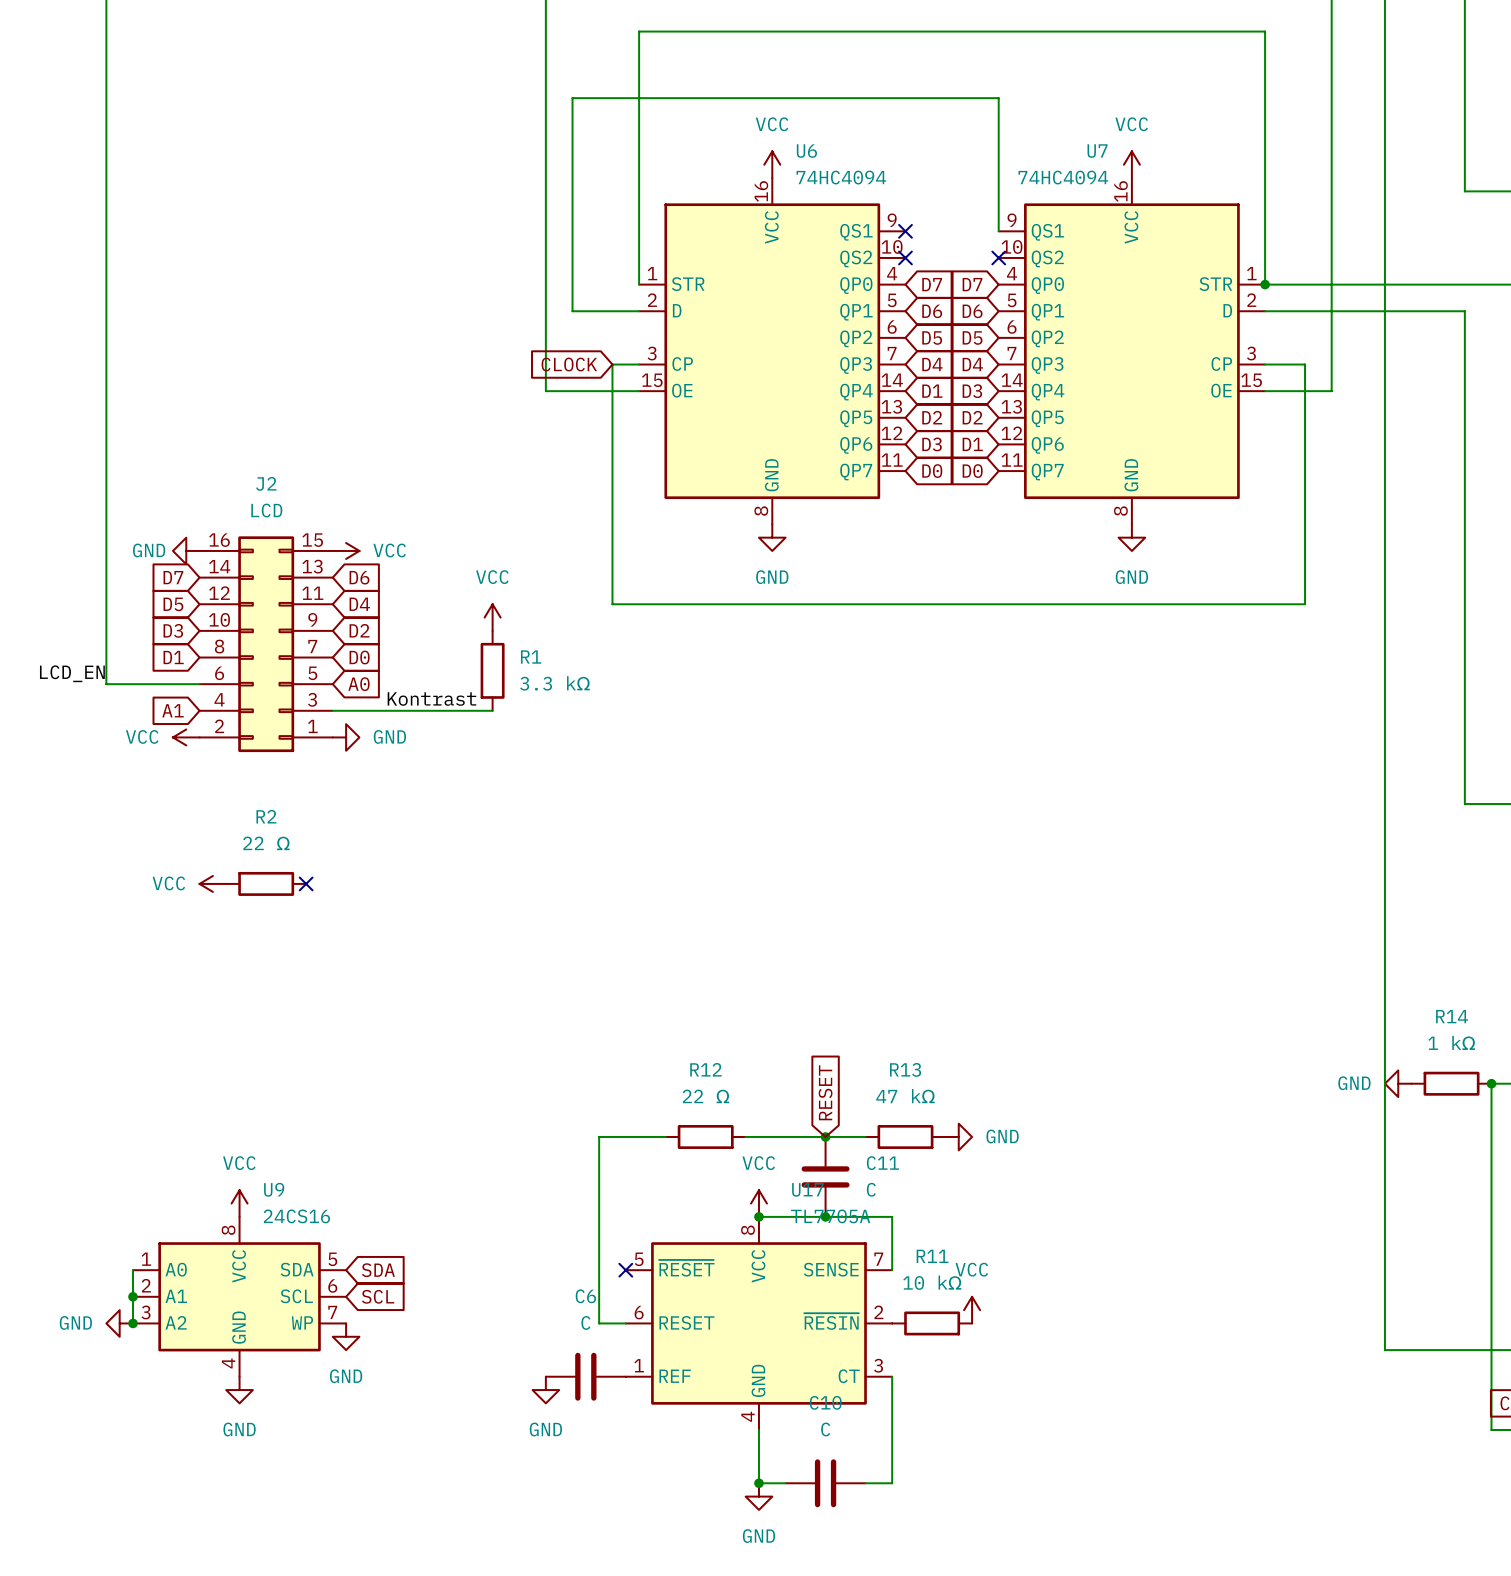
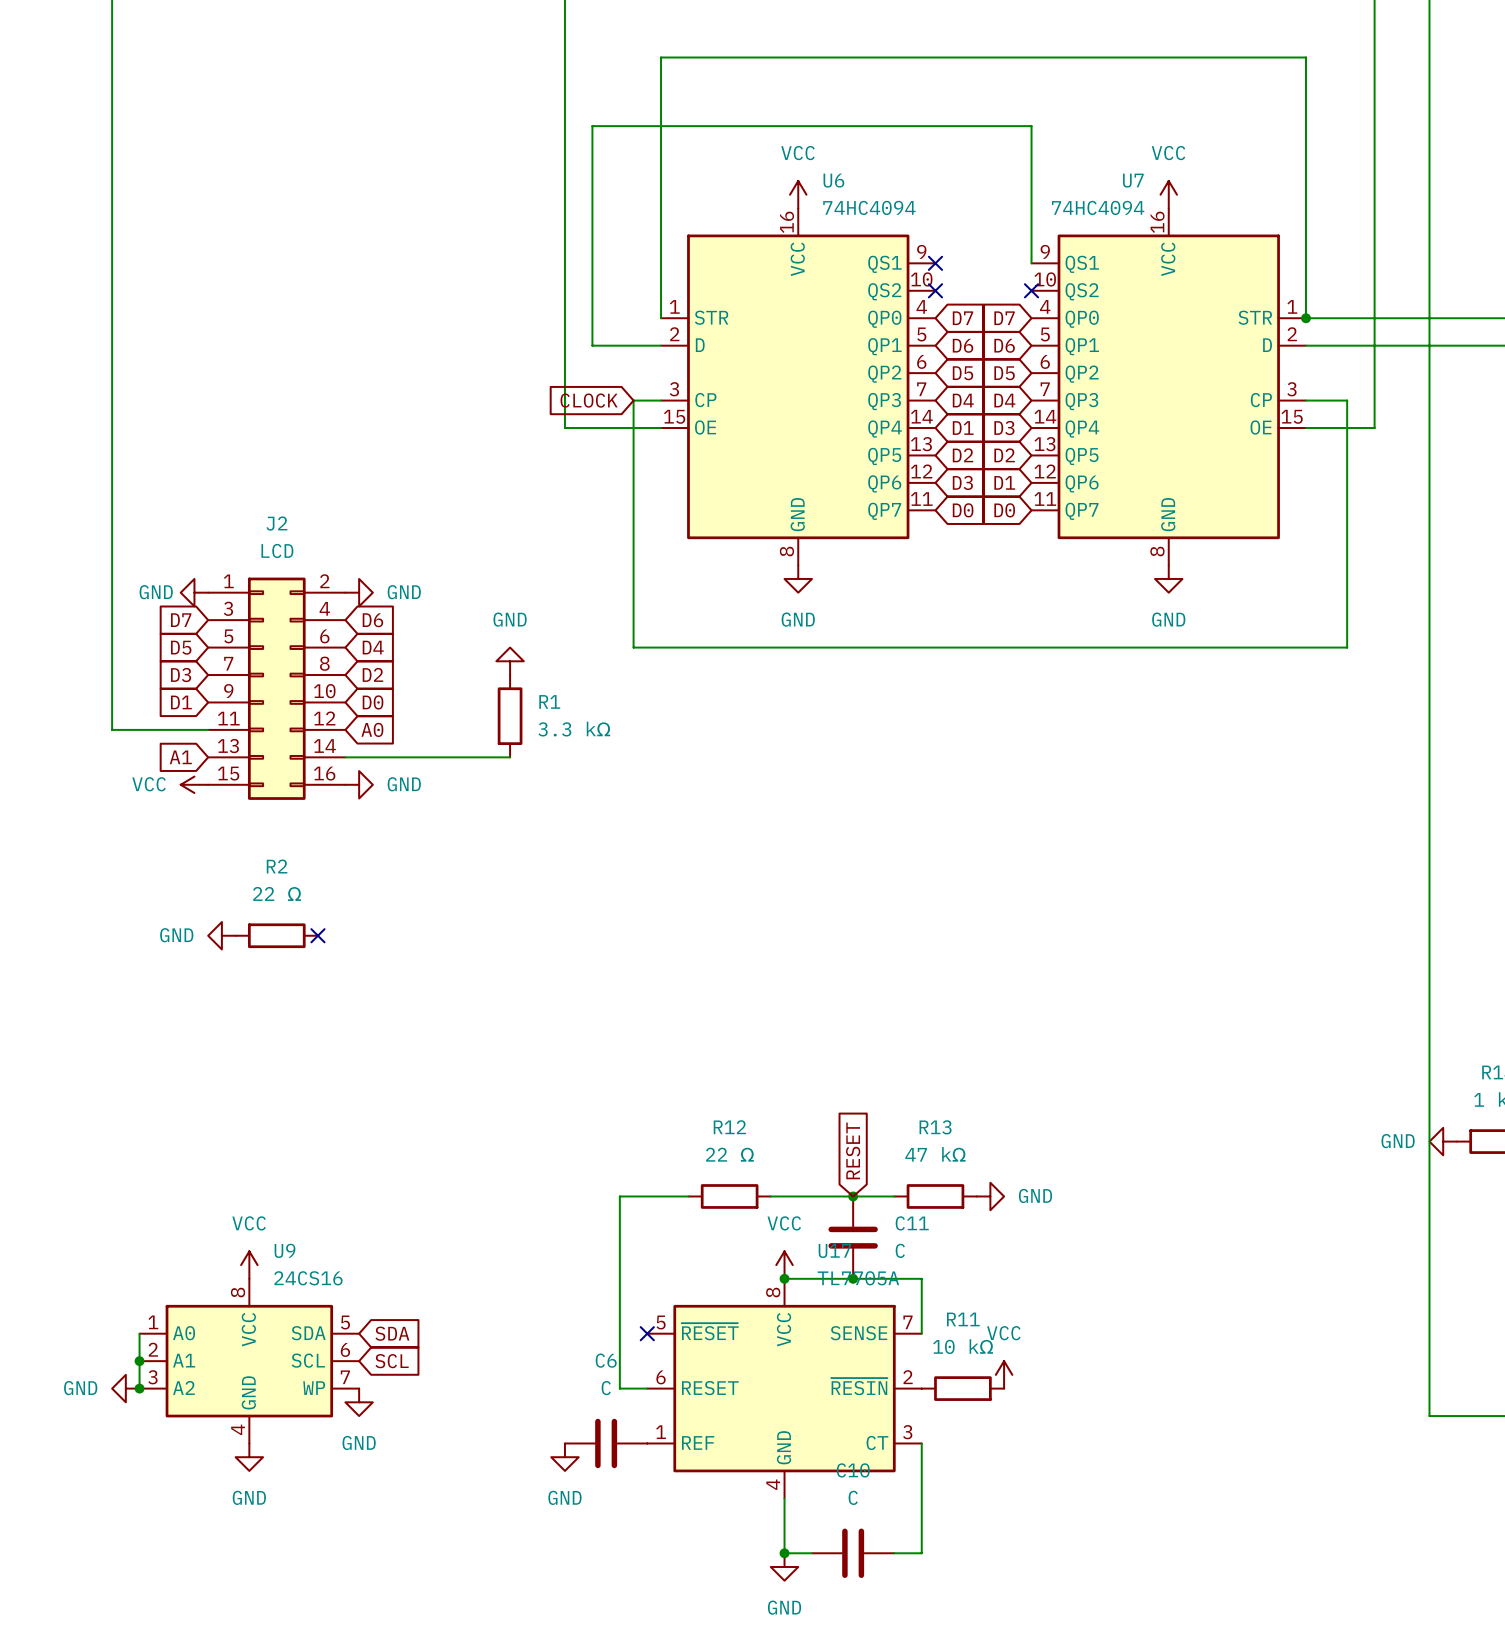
power symbol: VCC (346, 550) -> GND (359, 592)
power symbol: VCC (492, 617) -> GND (510, 661)
J2 rotation: 0° (266, 644) -> 180° (276, 688)
label: LCD_EN (72, 673) -> none
label: Kontrast (431, 699) -> none
power symbol: VCC (212, 883) -> GND (221, 935)

